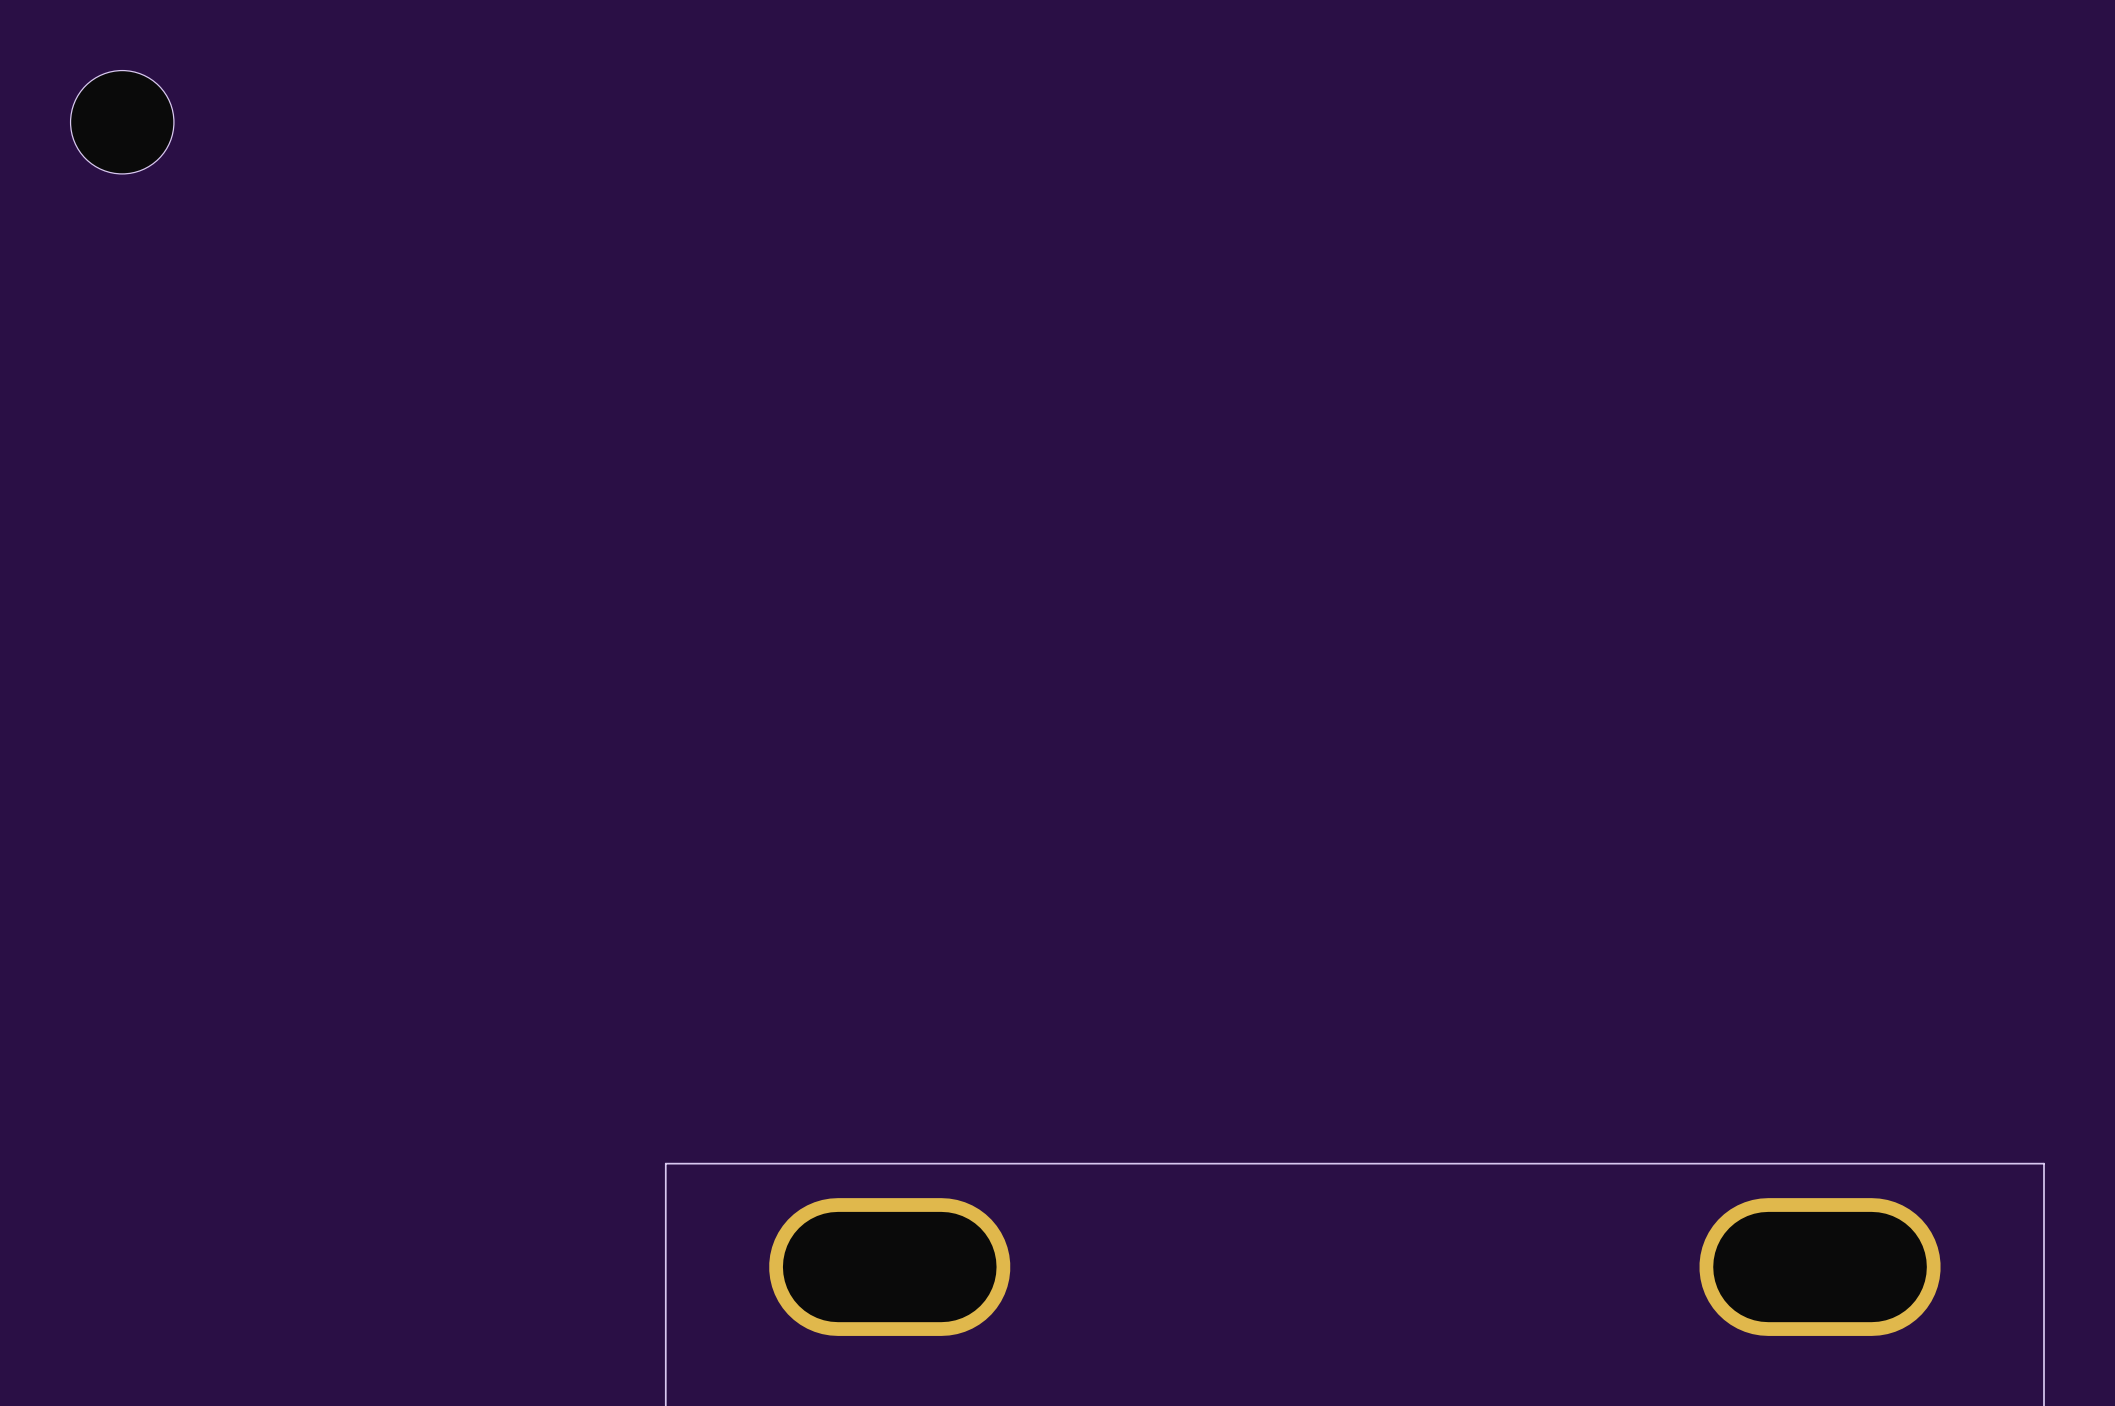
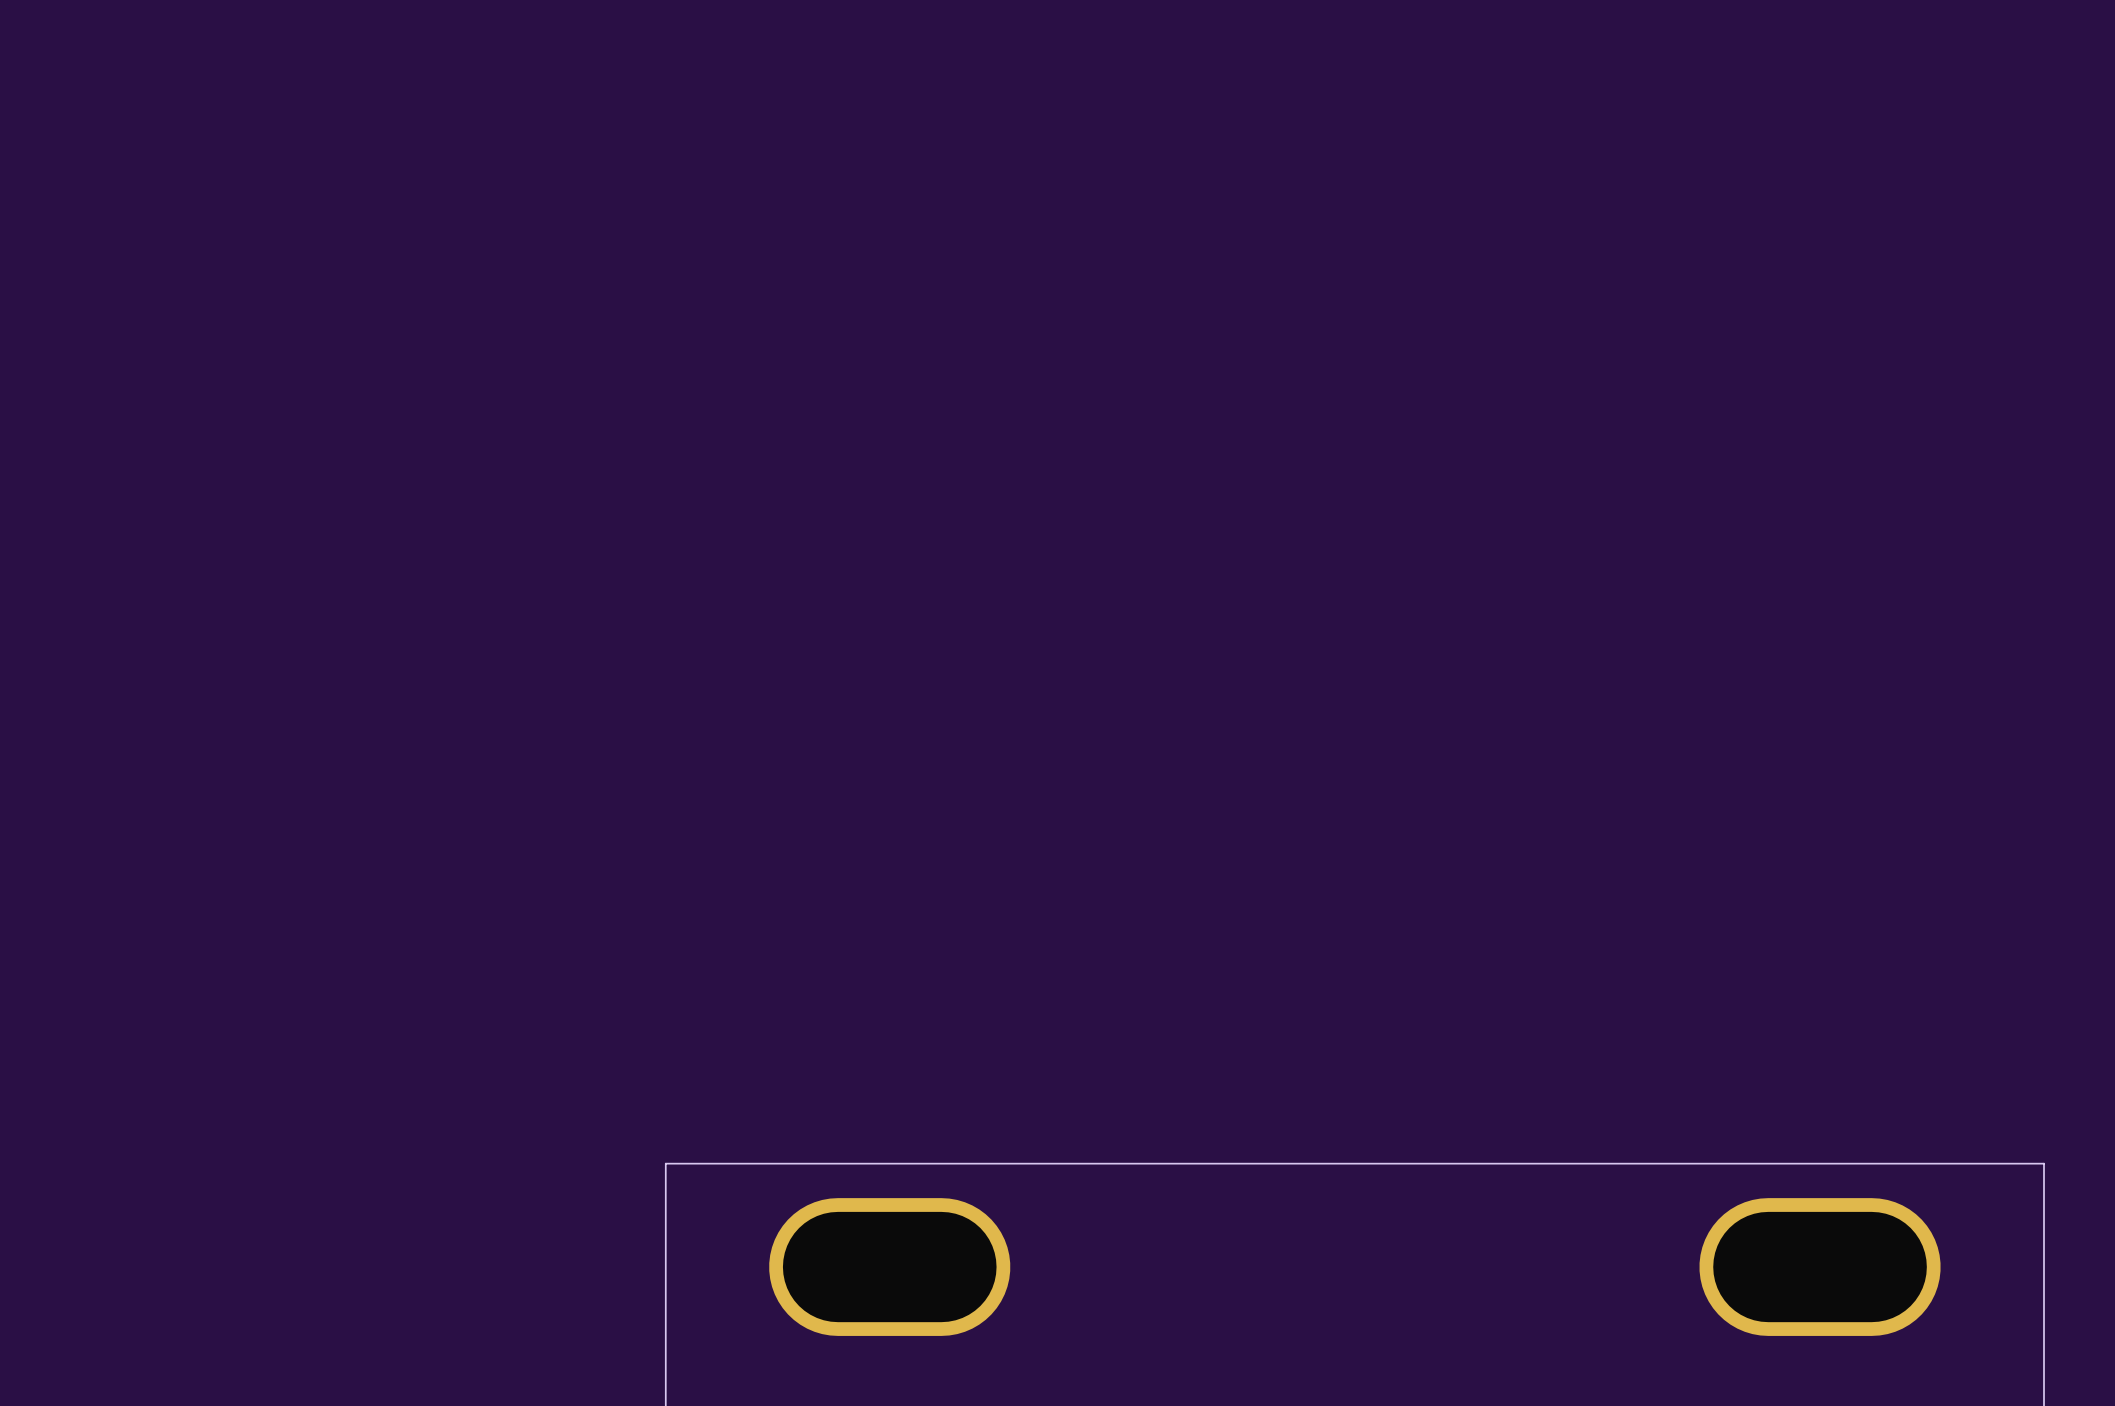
part: (122, 122) -> none

